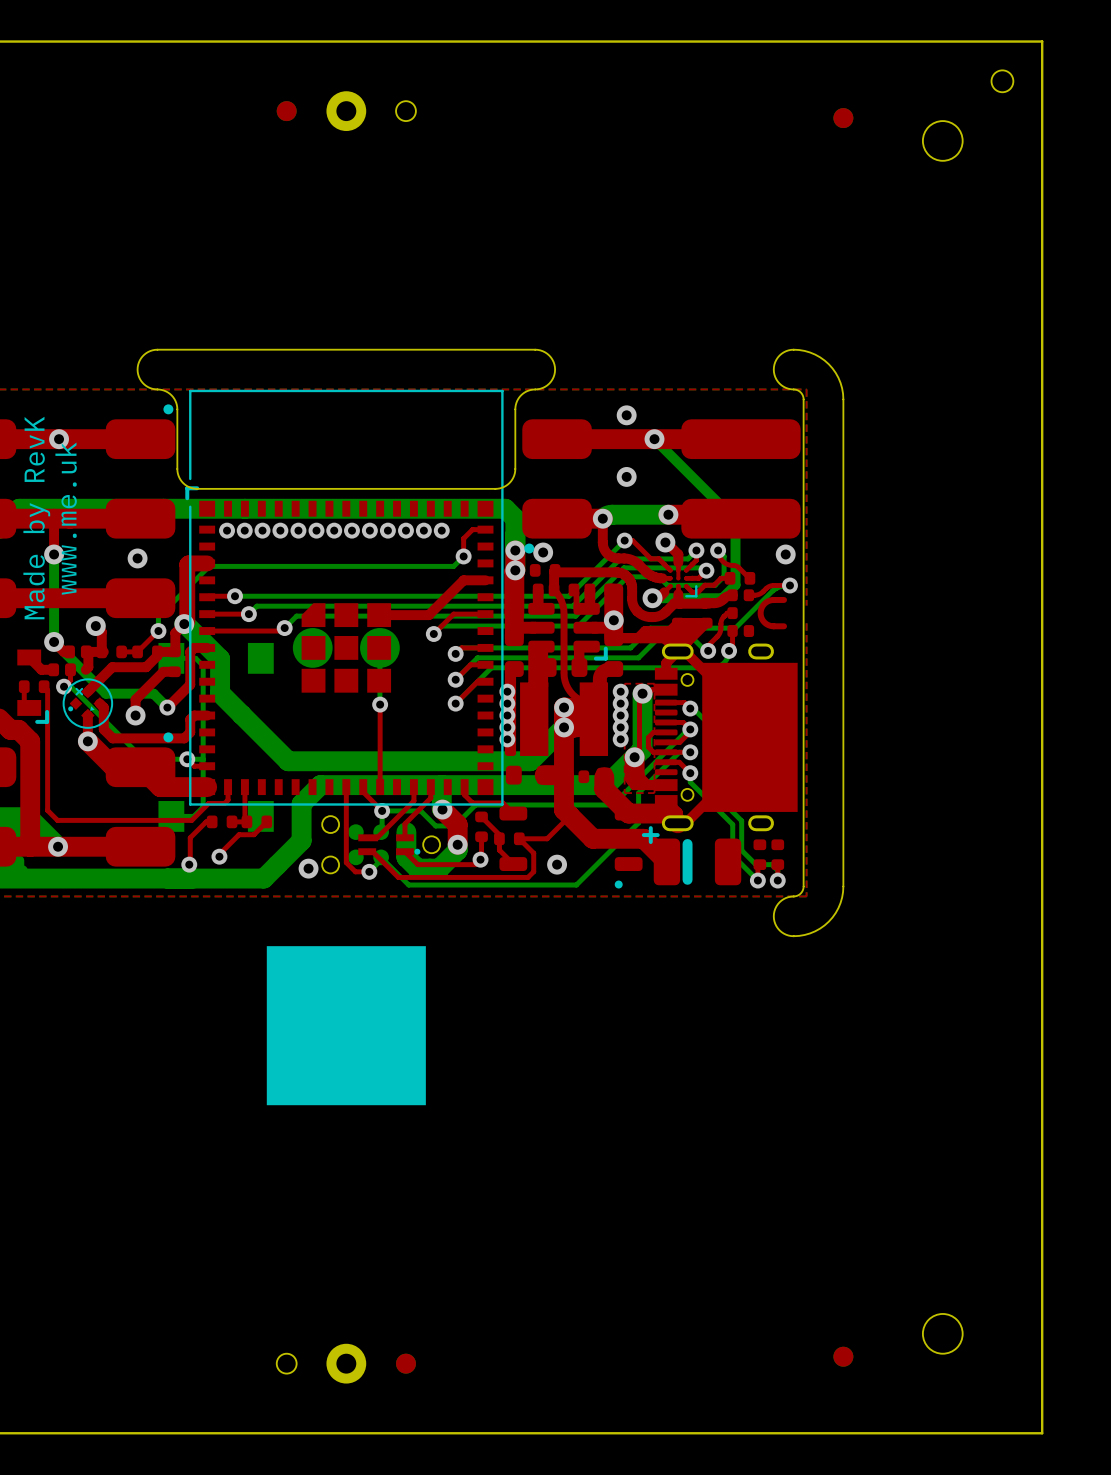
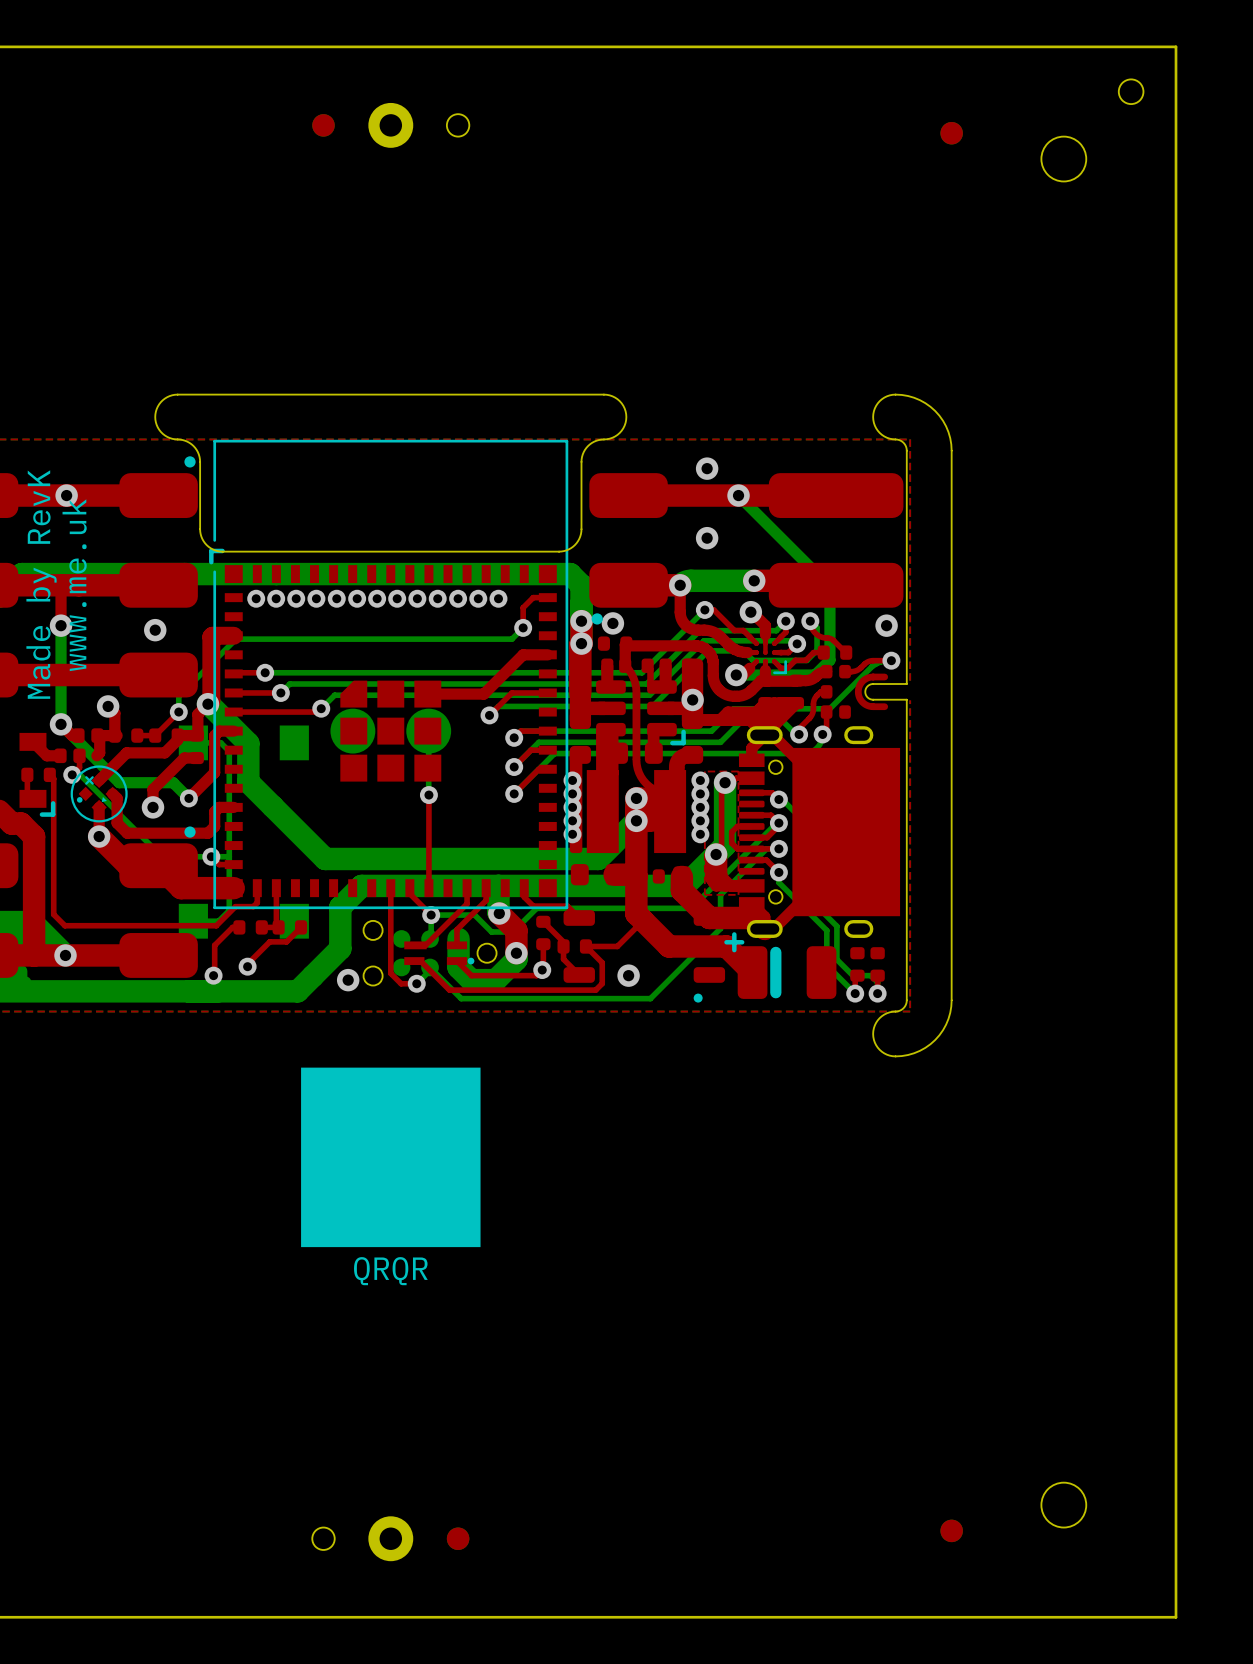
board edge: (803, 606) (803, 620) -> (906, 684) (872, 684) (866, 687) (865, 691) (866, 696) (872, 699) (906, 699)
text: none -> QRQR (390, 1271)

